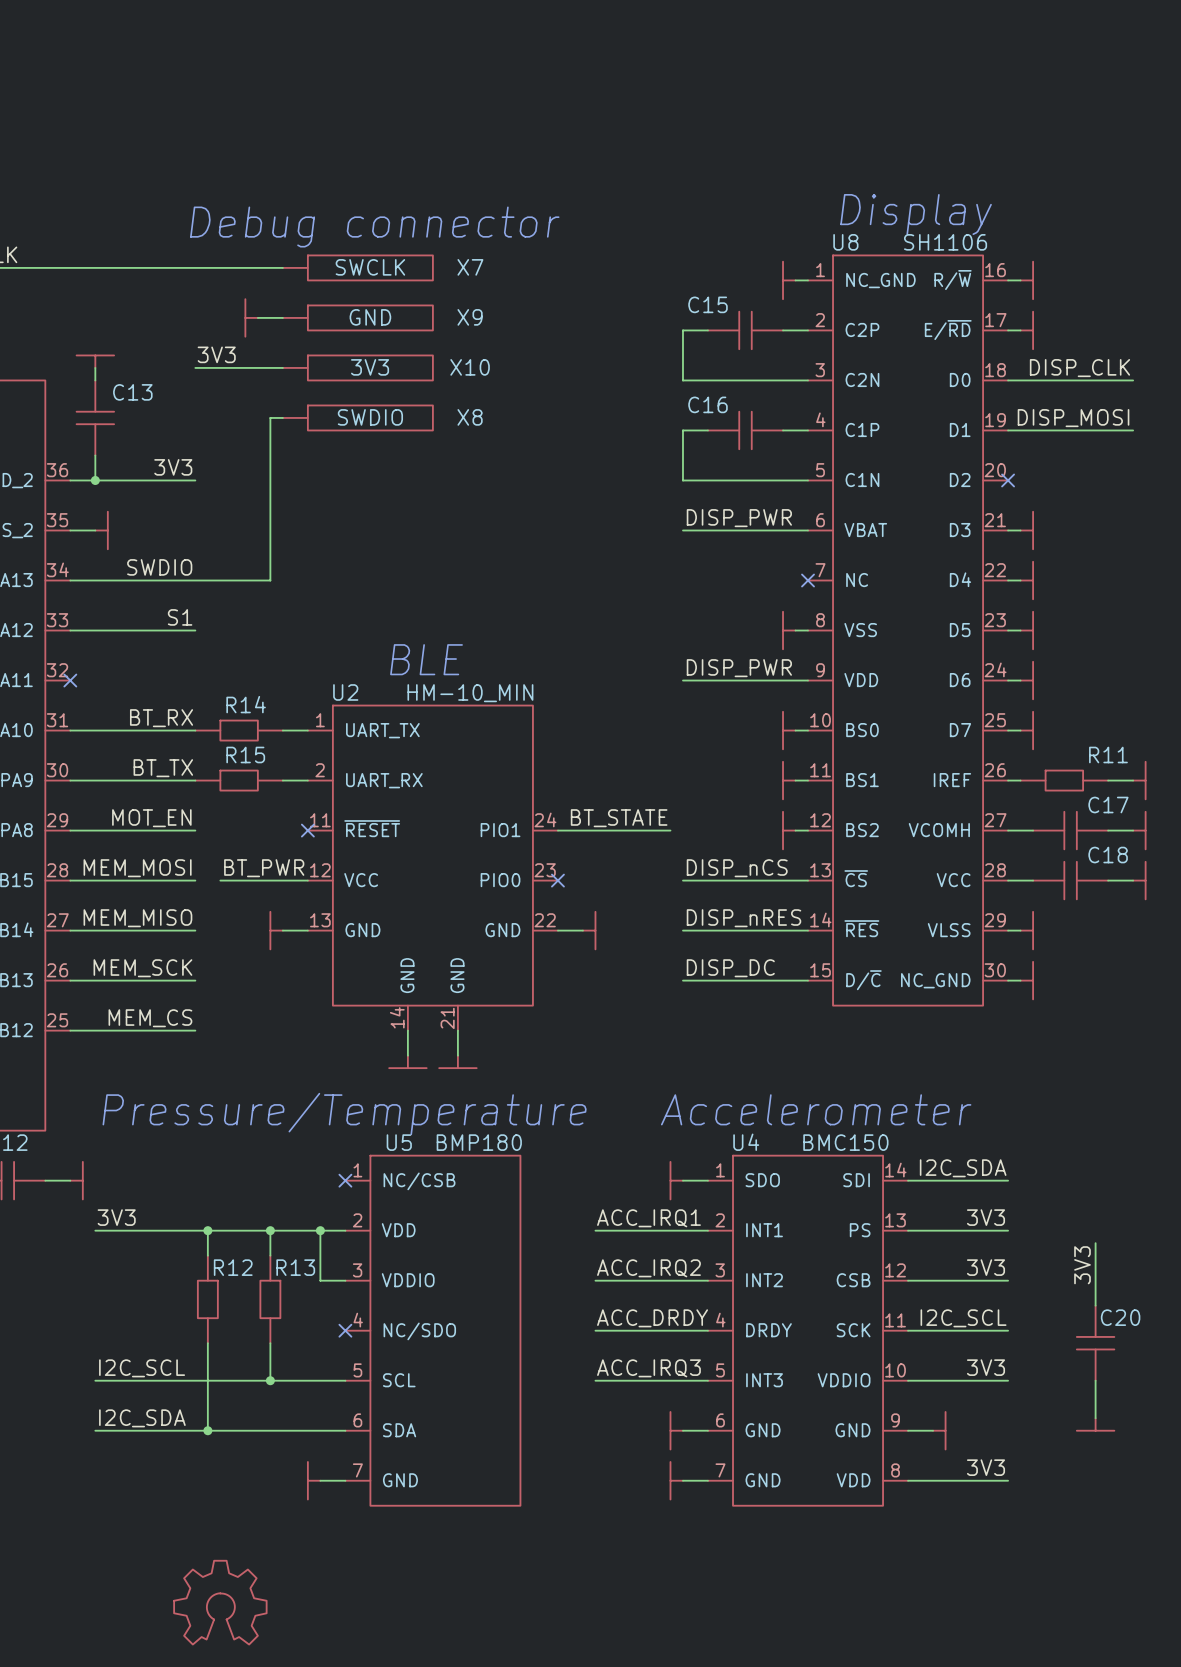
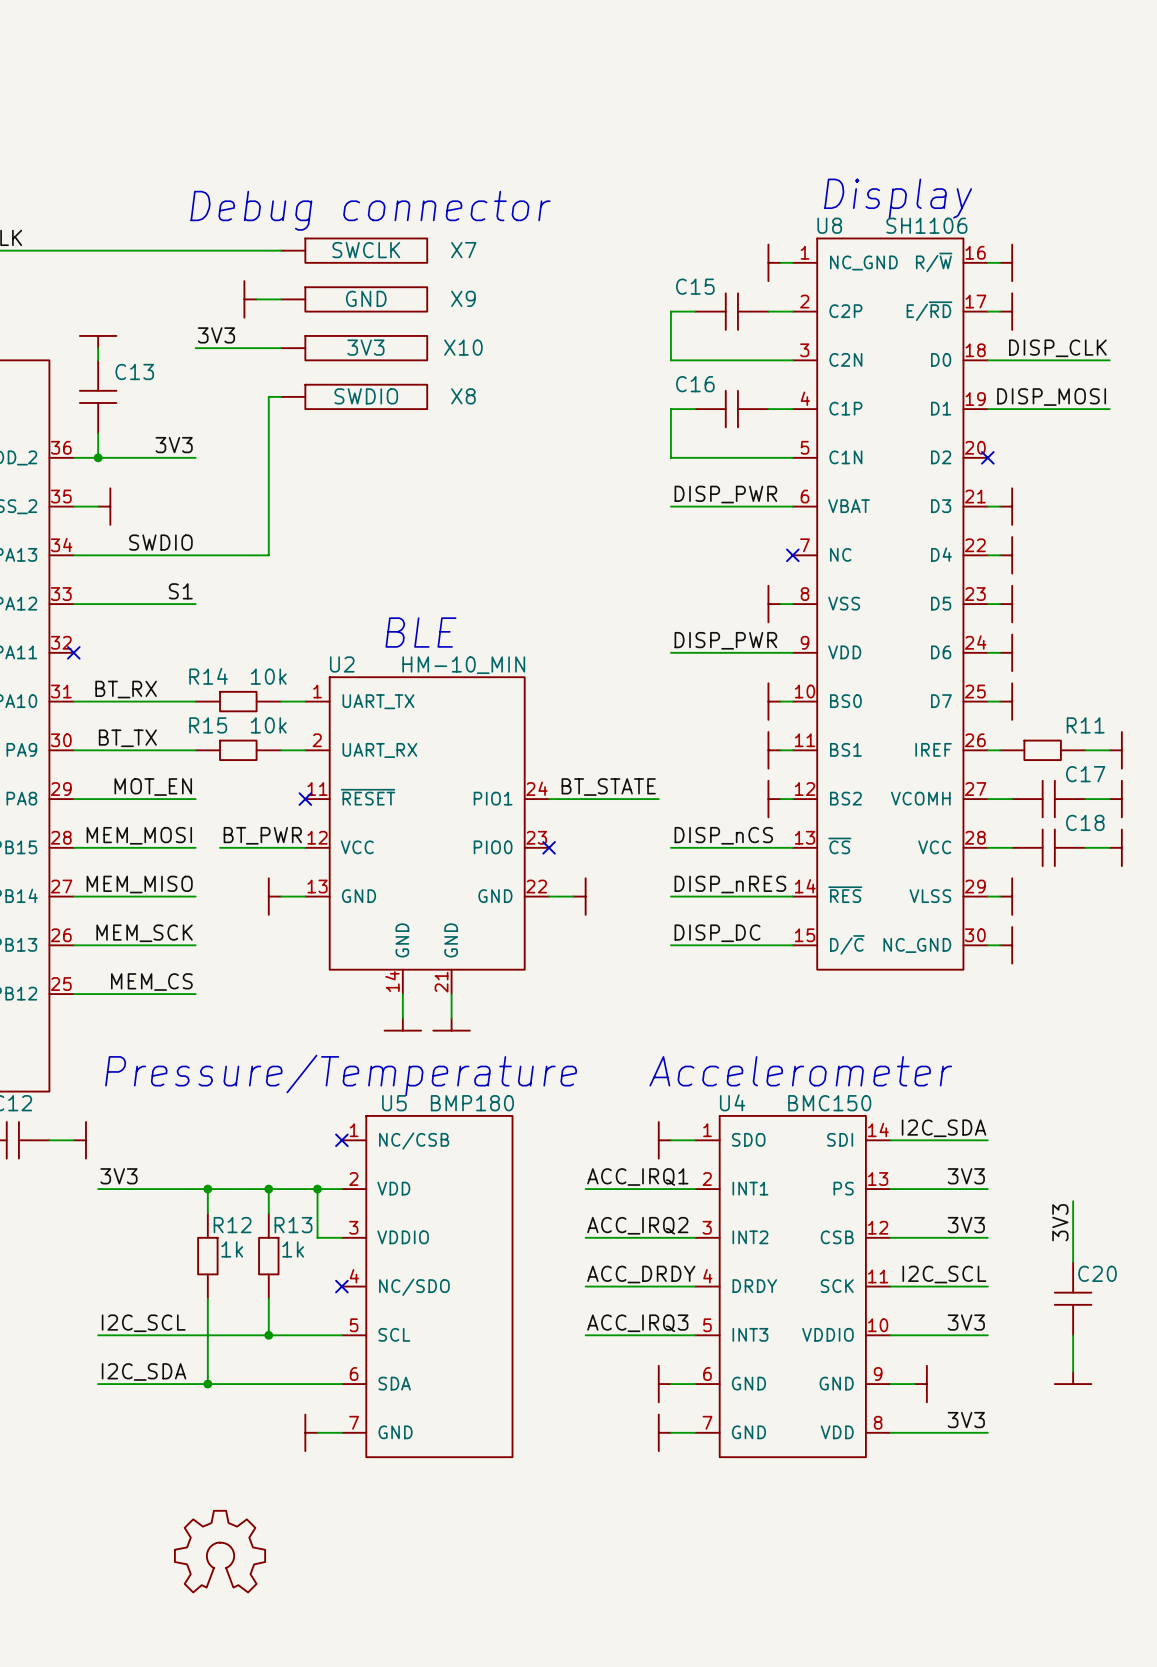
R14 name position: R14 (246, 704) -> R14 (208, 676)
R14 value: none -> 10k (268, 676)
label position: BT_RX (161, 718) -> BT_RX (126, 689)
R15 name position: R15 (245, 754) -> R15 (208, 725)
R15 value: none -> 10k (268, 725)
label position: BT_TX (163, 768) -> BT_TX (127, 738)
R12 value: none -> 1k (232, 1249)
R13 value: none -> 1k (293, 1249)

